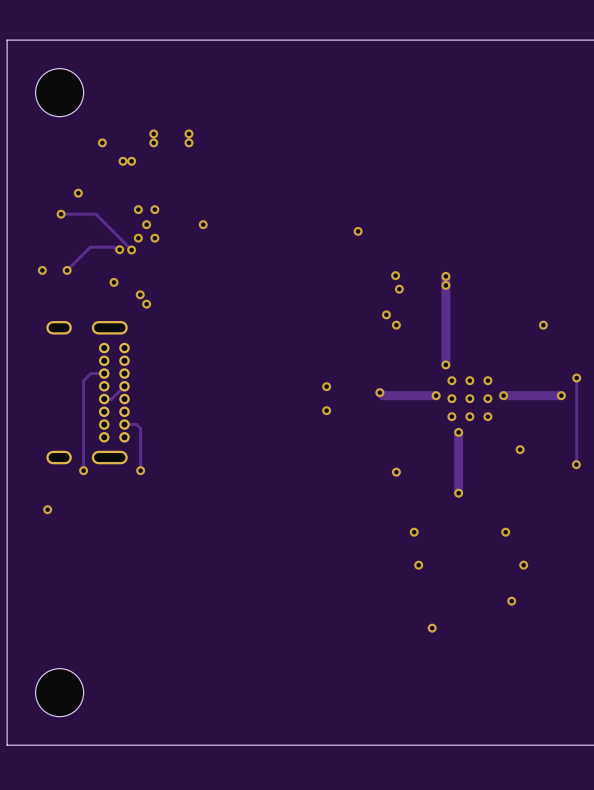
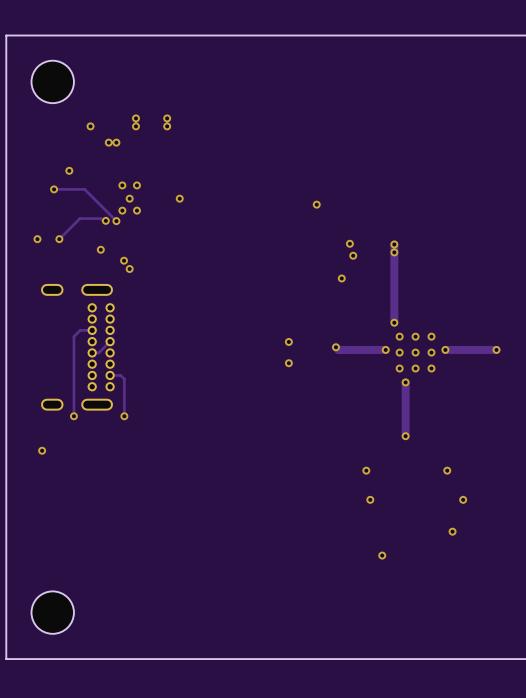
via: (396, 325) -> none
via: (543, 325) -> none
track: (576, 377) (576, 464) -> none
via: (576, 377) -> none
via: (520, 449) -> none
via: (576, 464) -> none
via: (396, 472) -> none

